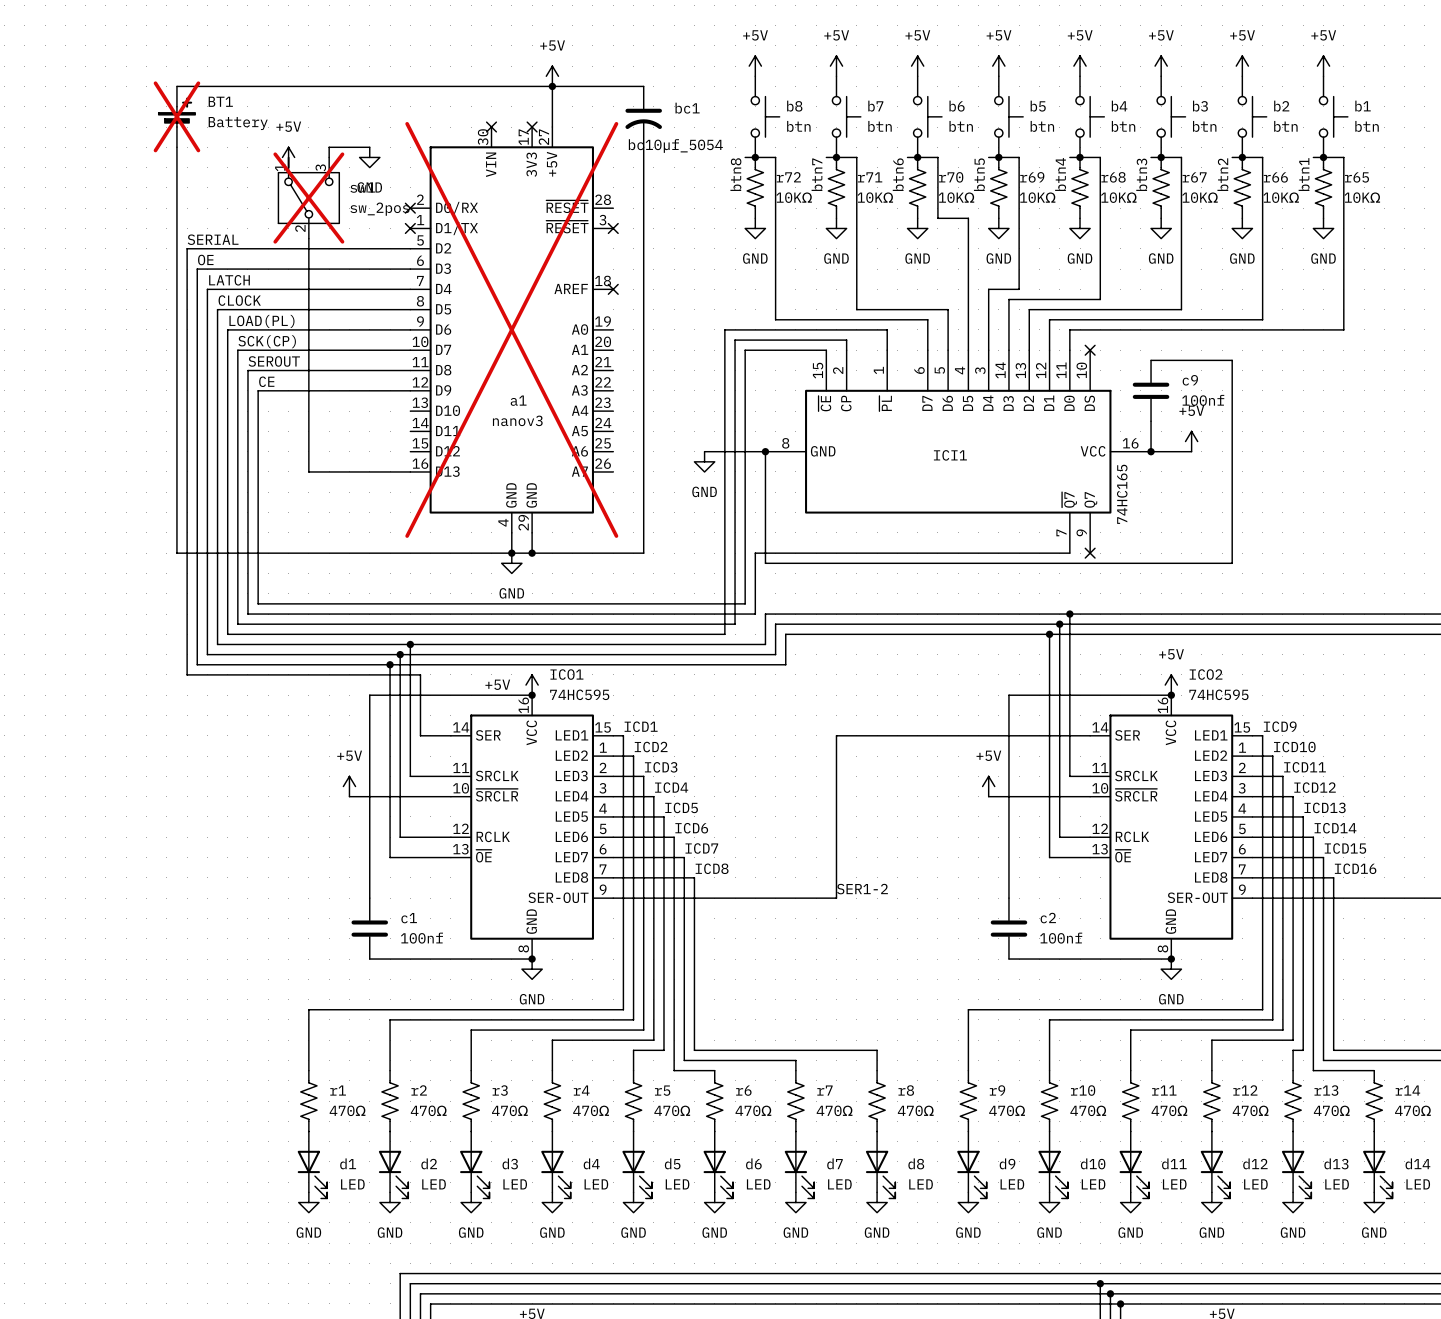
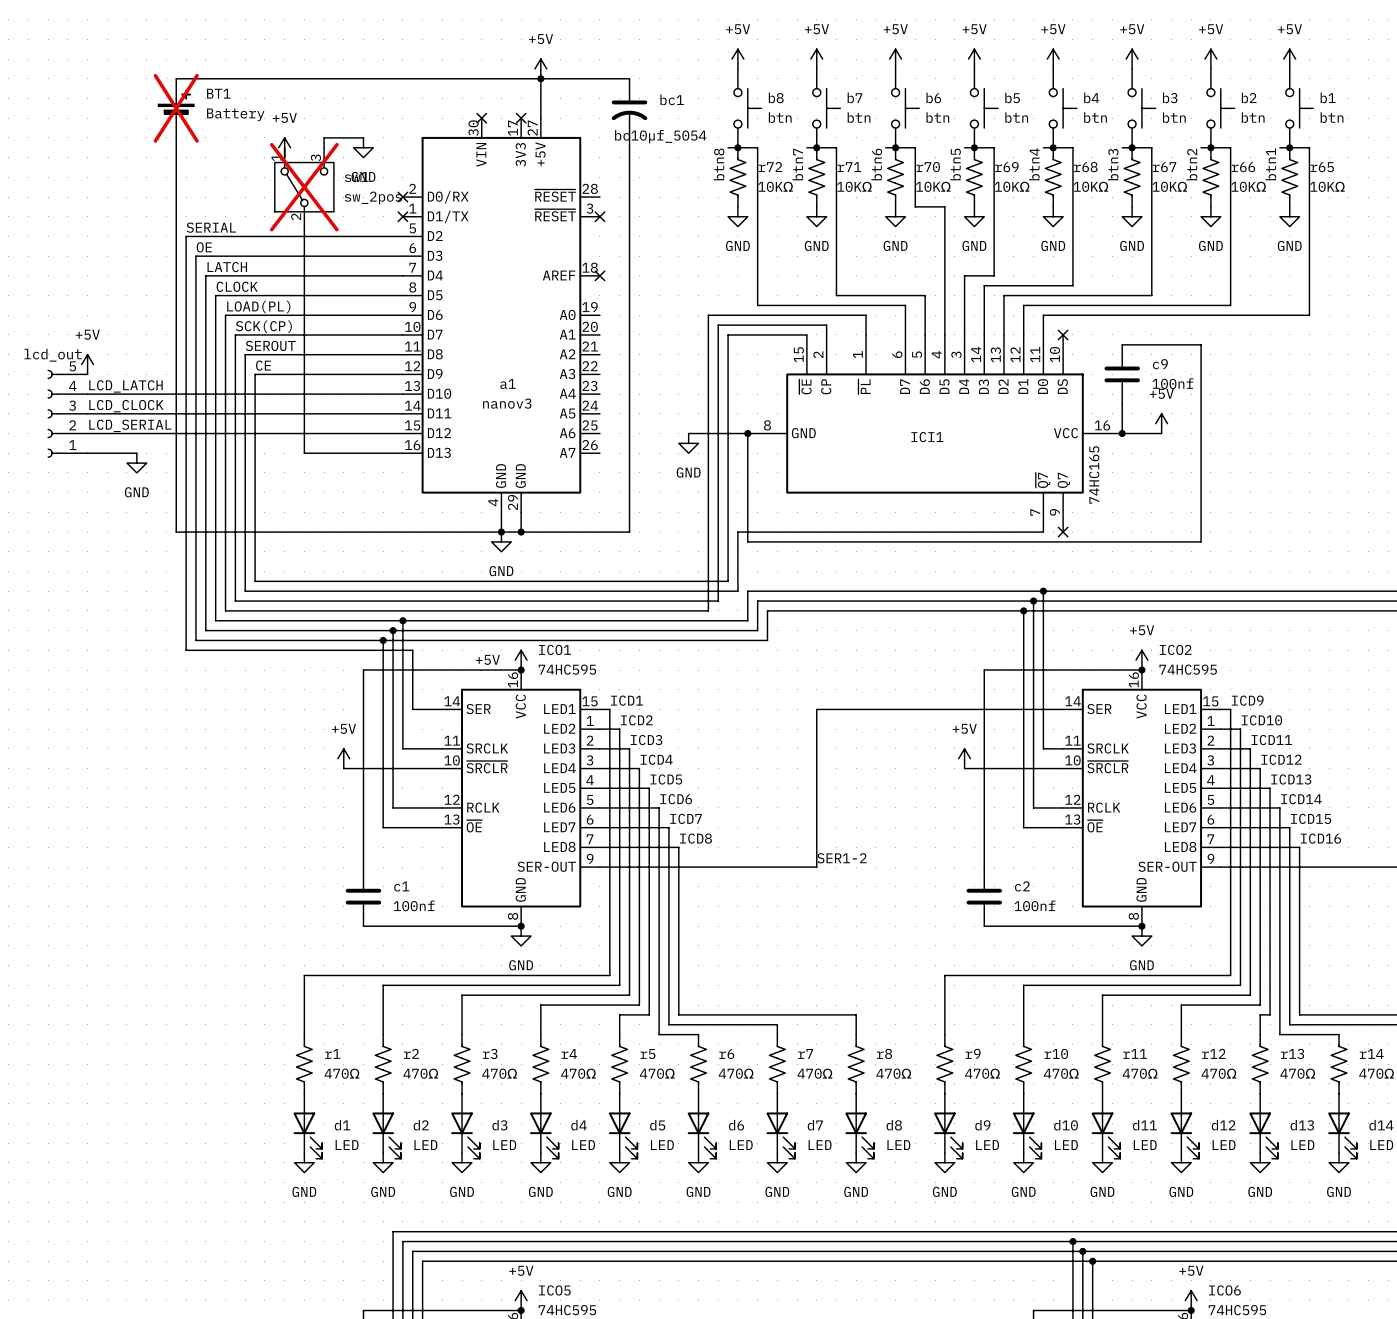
a1 do-not-place cross: (511, 329) -> none
power symbol: none -> +5V (87, 364)
label: none -> LCD_LATCH (125, 386)
wire: none -> (87, 394) (402, 394)
label: none -> LCD_CLOCK (126, 406)
part: none -> lcd_out (67, 413)
wire: none -> (87, 413) (402, 413)
label: none -> LCD_SERIAL (130, 425)
wire: none -> (87, 433) (402, 433)
wire: none -> (87, 453) (136, 453)
power symbol: none -> GND (136, 463)

